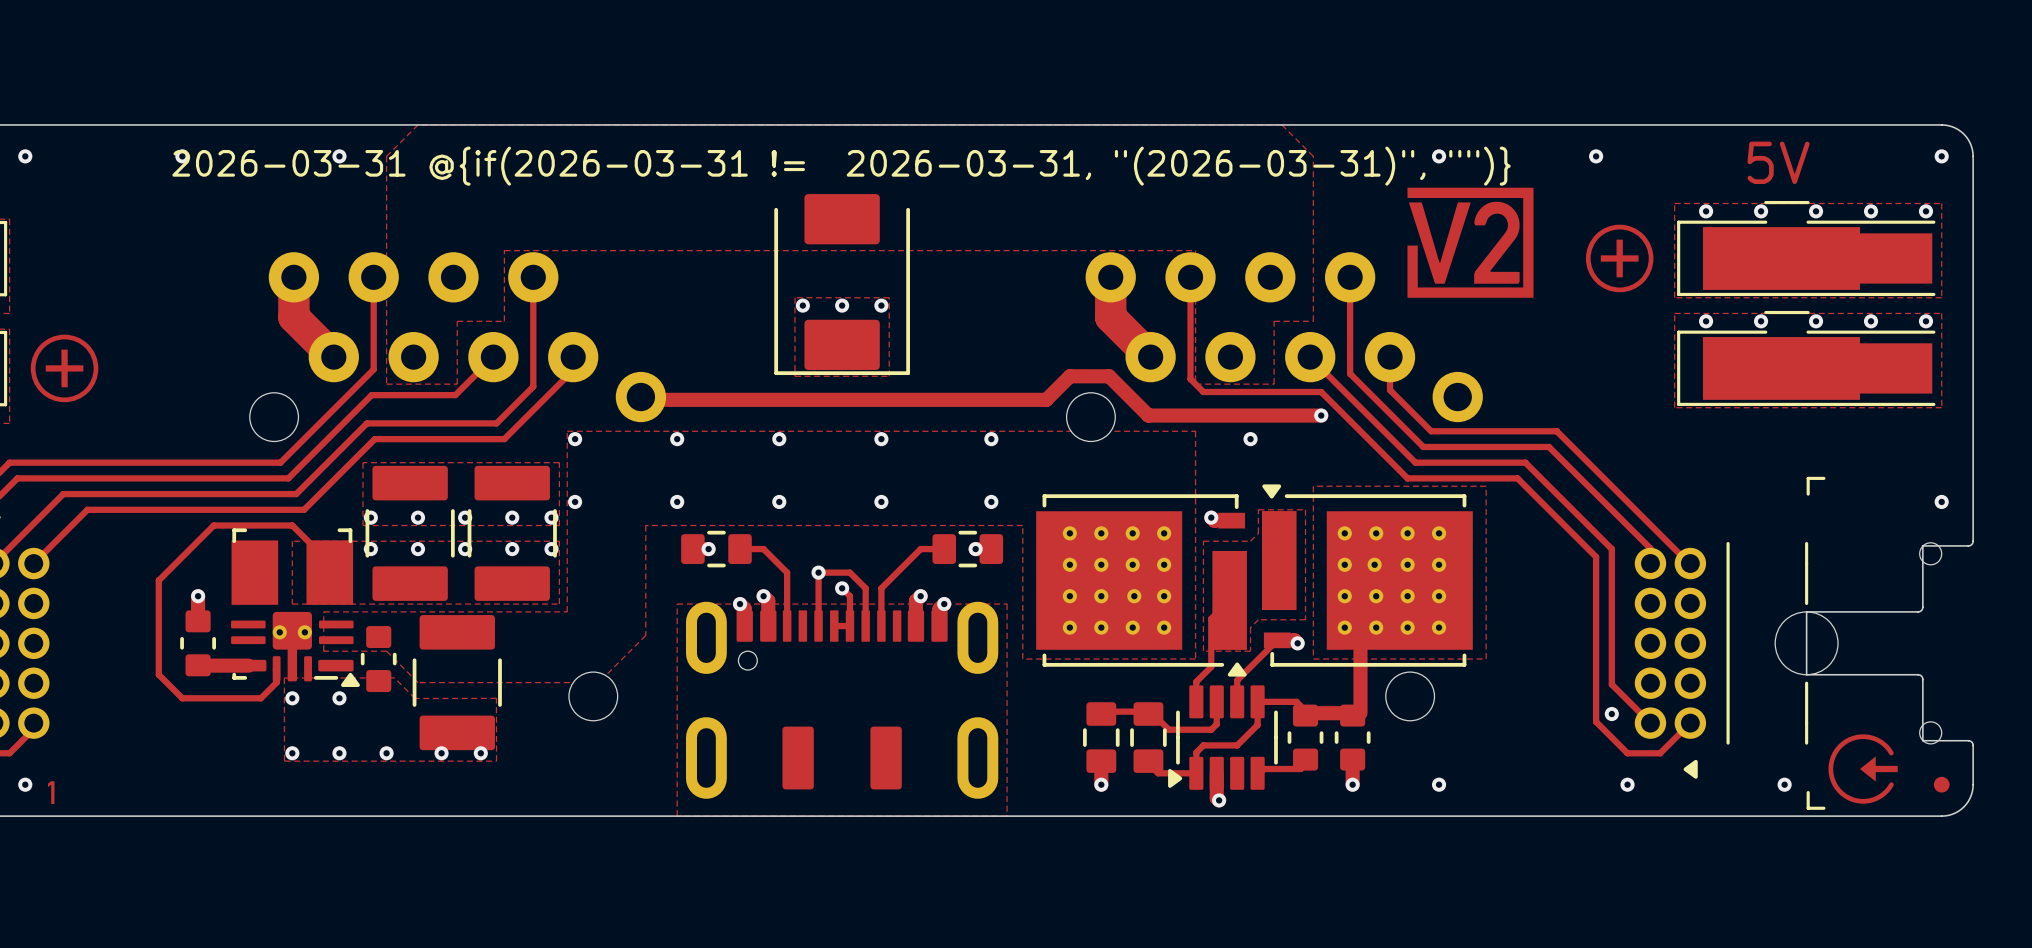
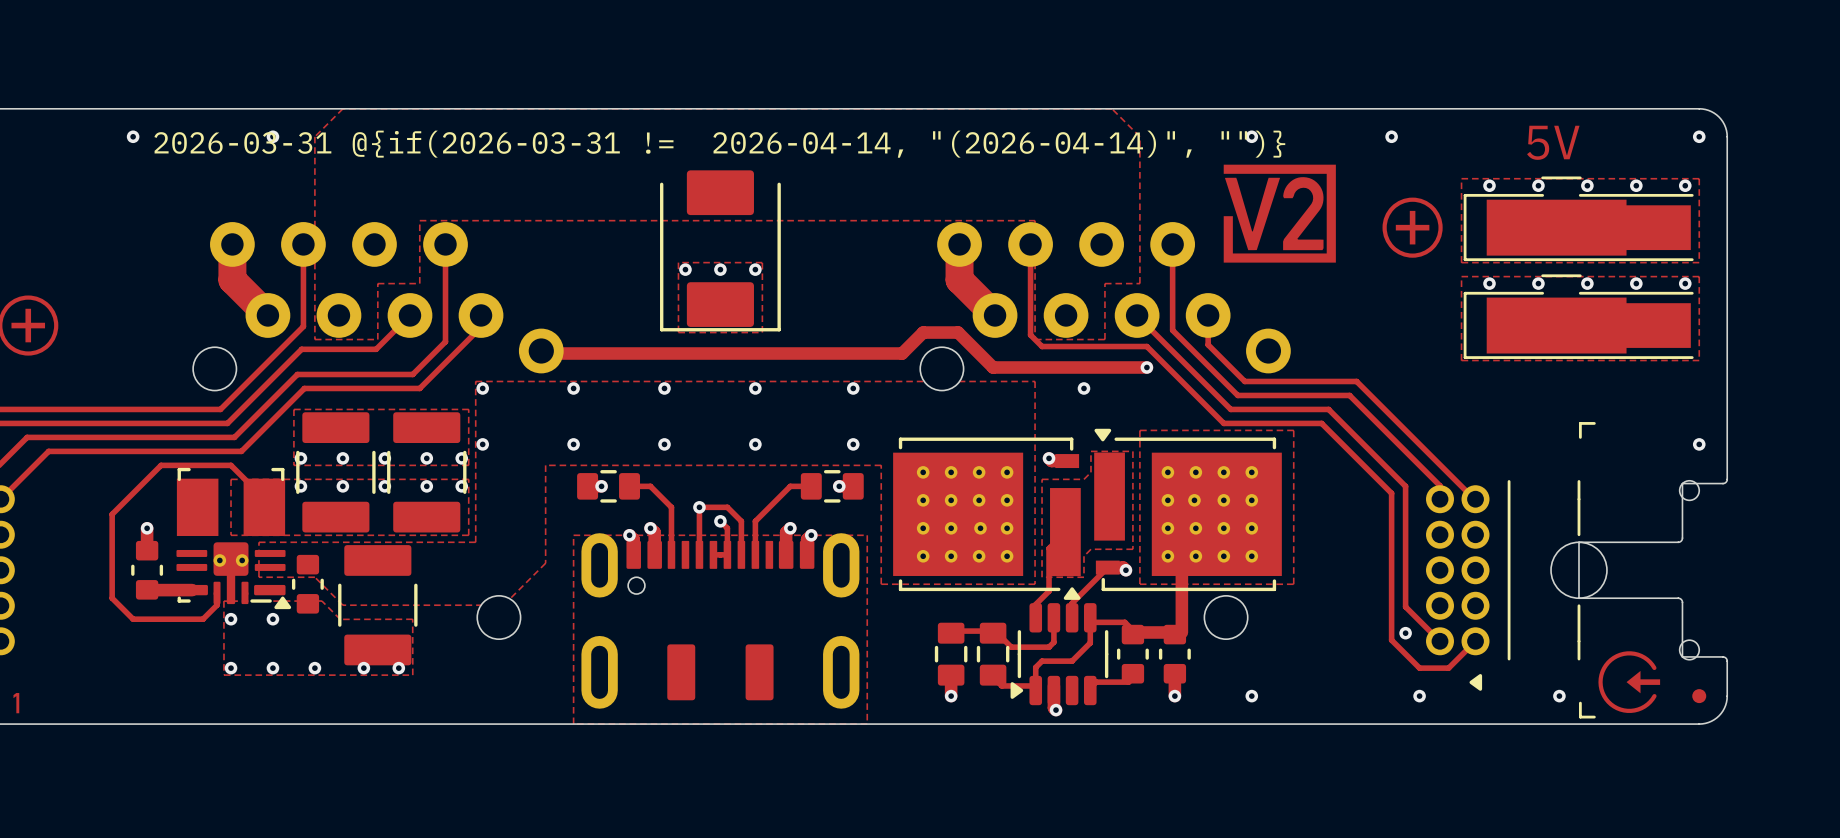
drawing shape: [172, 146, 1511, 186] -> [154, 130, 1286, 158]
part footprint: [1168, 685, 1278, 790] -> [1010, 603, 1109, 706]

